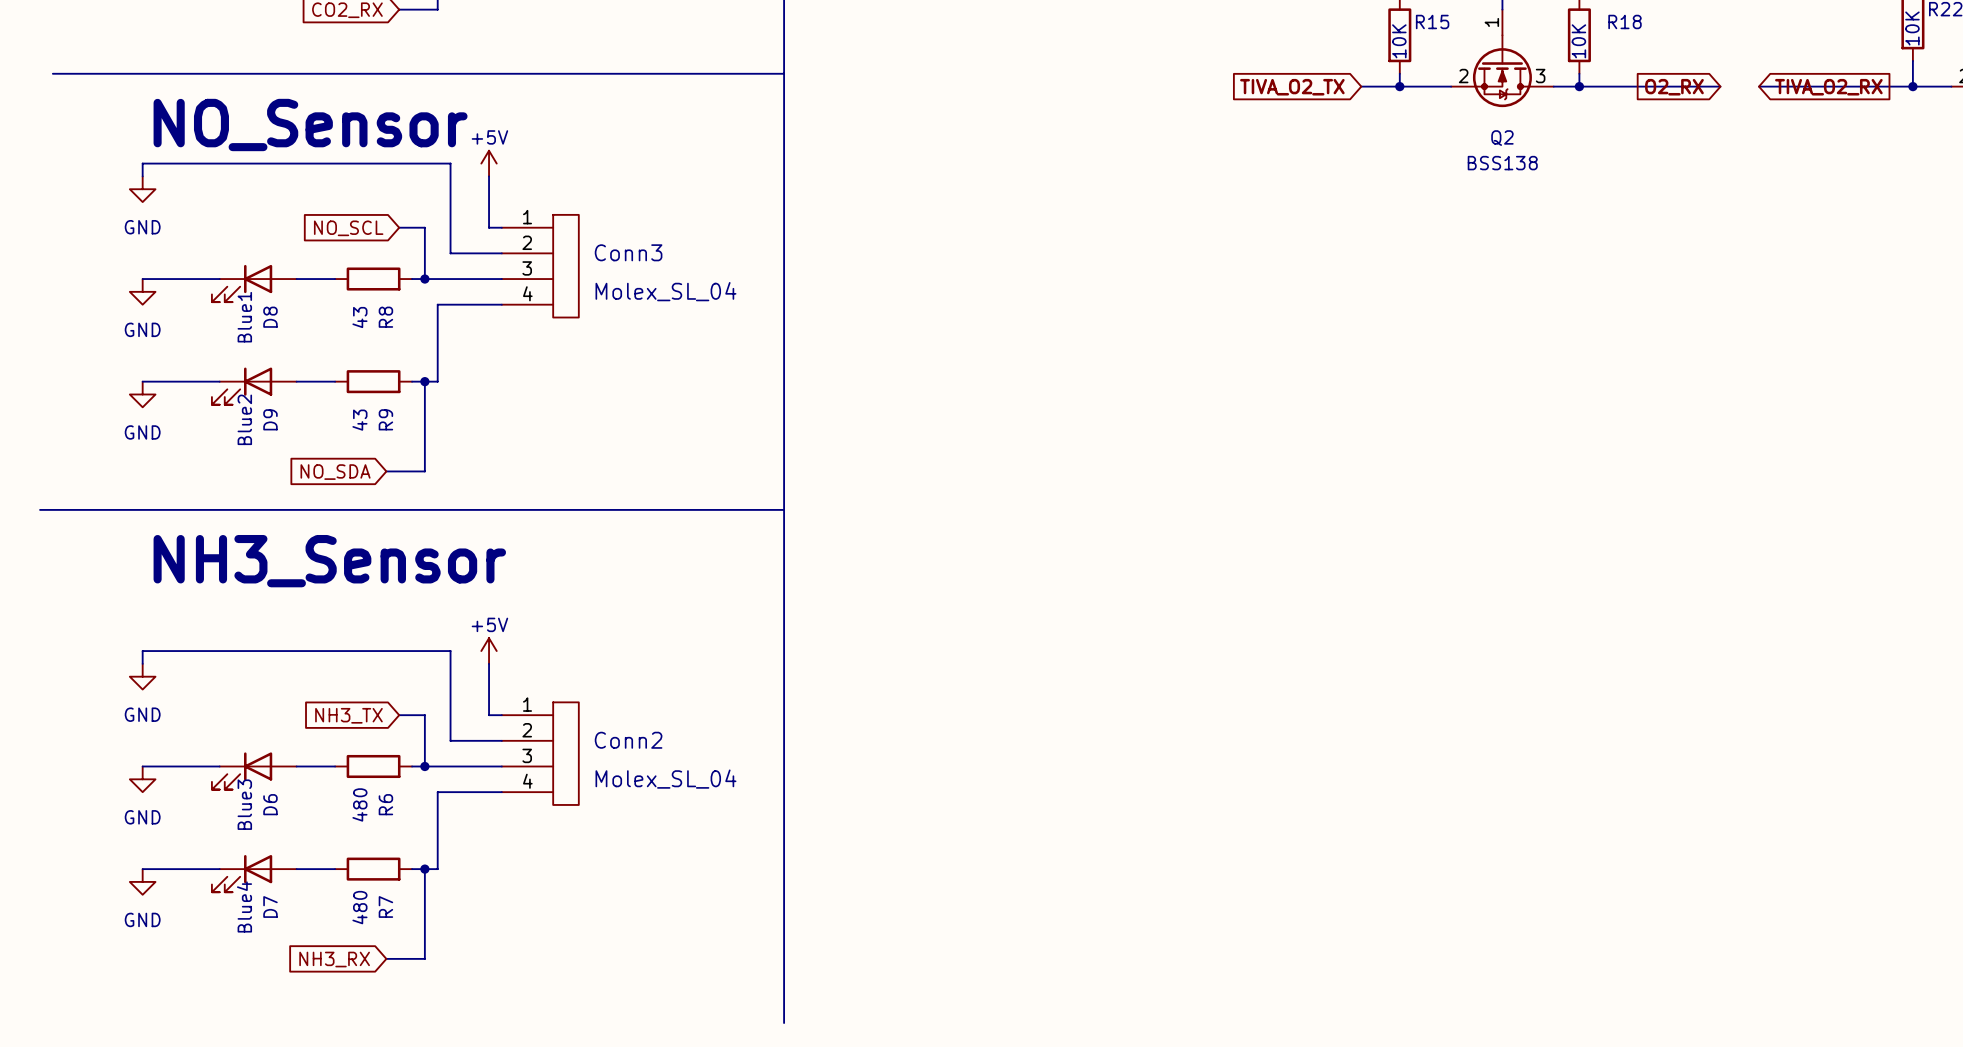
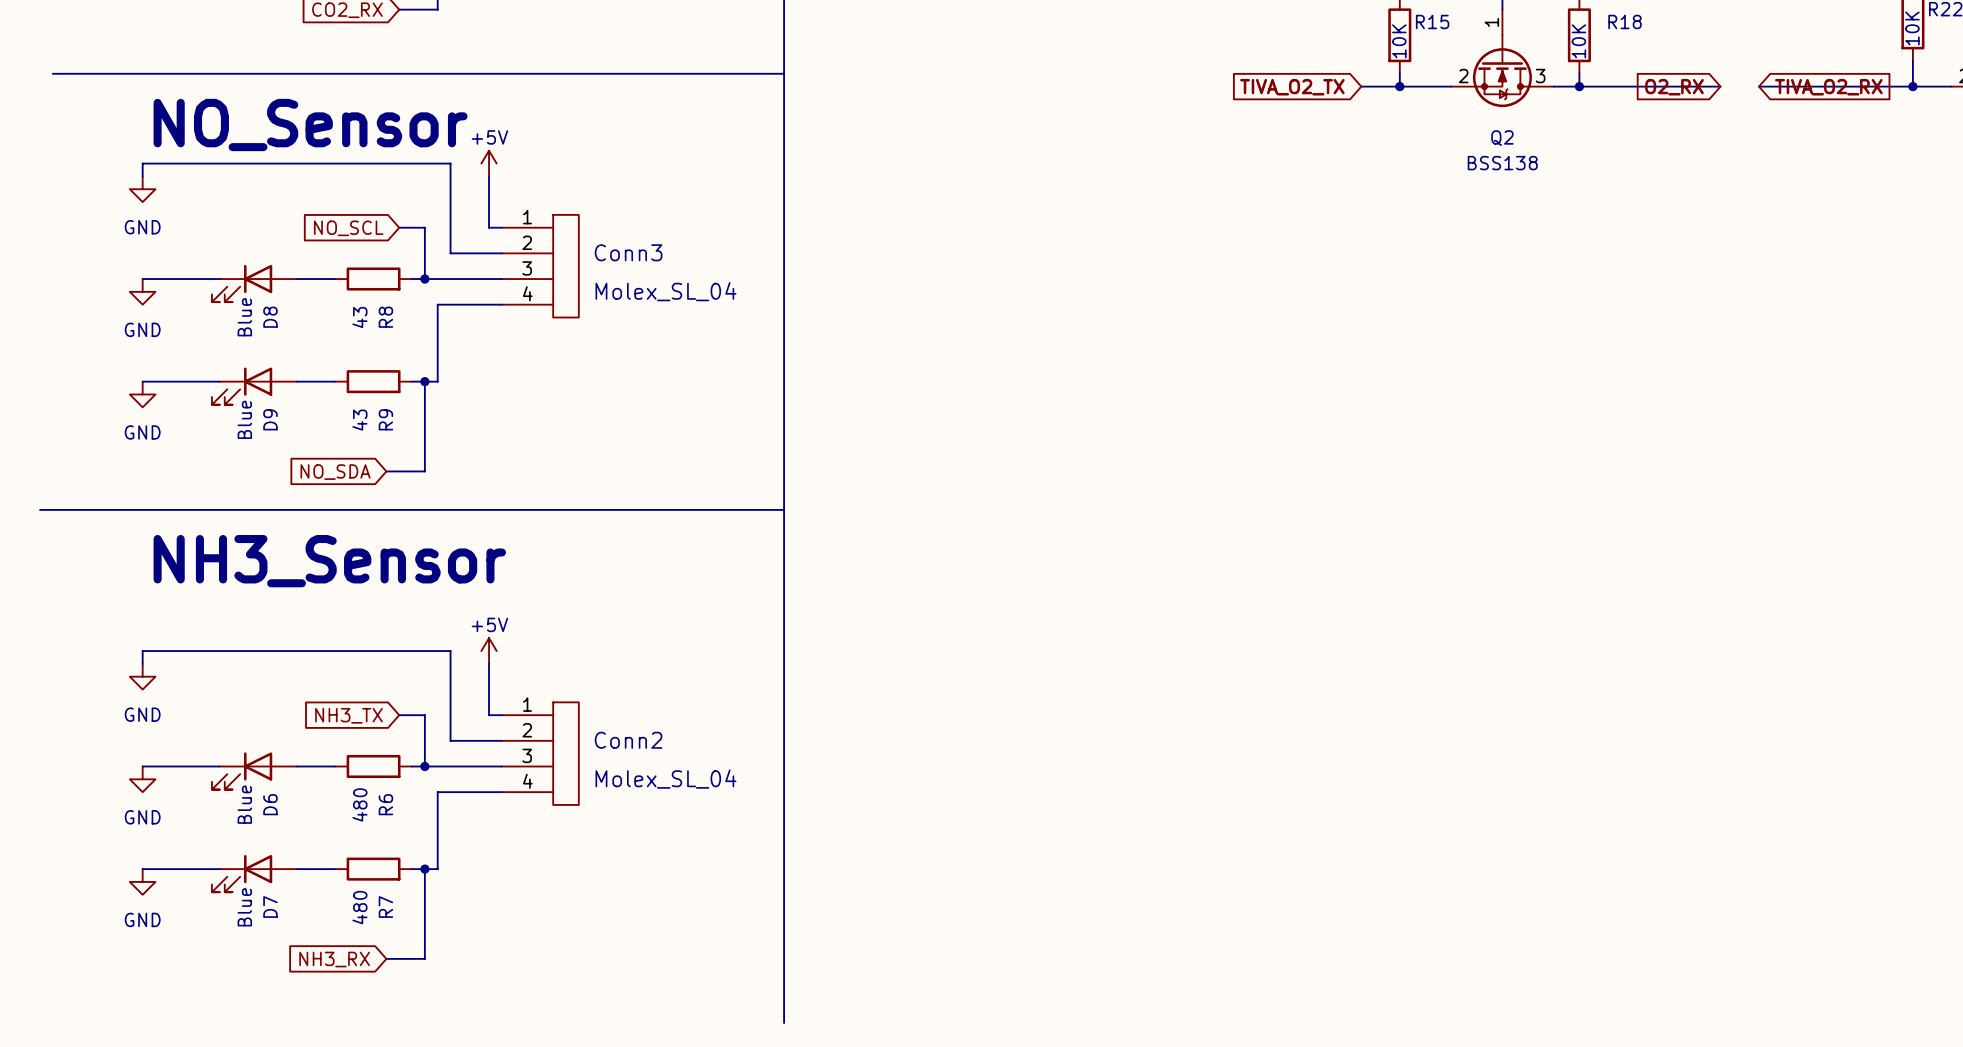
Blue1 name: Blue1 (244, 317) -> Blue (244, 317)
Blue2 name: Blue2 (244, 419) -> Blue (244, 419)
Blue3 name: Blue3 (244, 804) -> Blue (244, 804)
Blue4 name: Blue4 (244, 906) -> Blue (244, 907)

